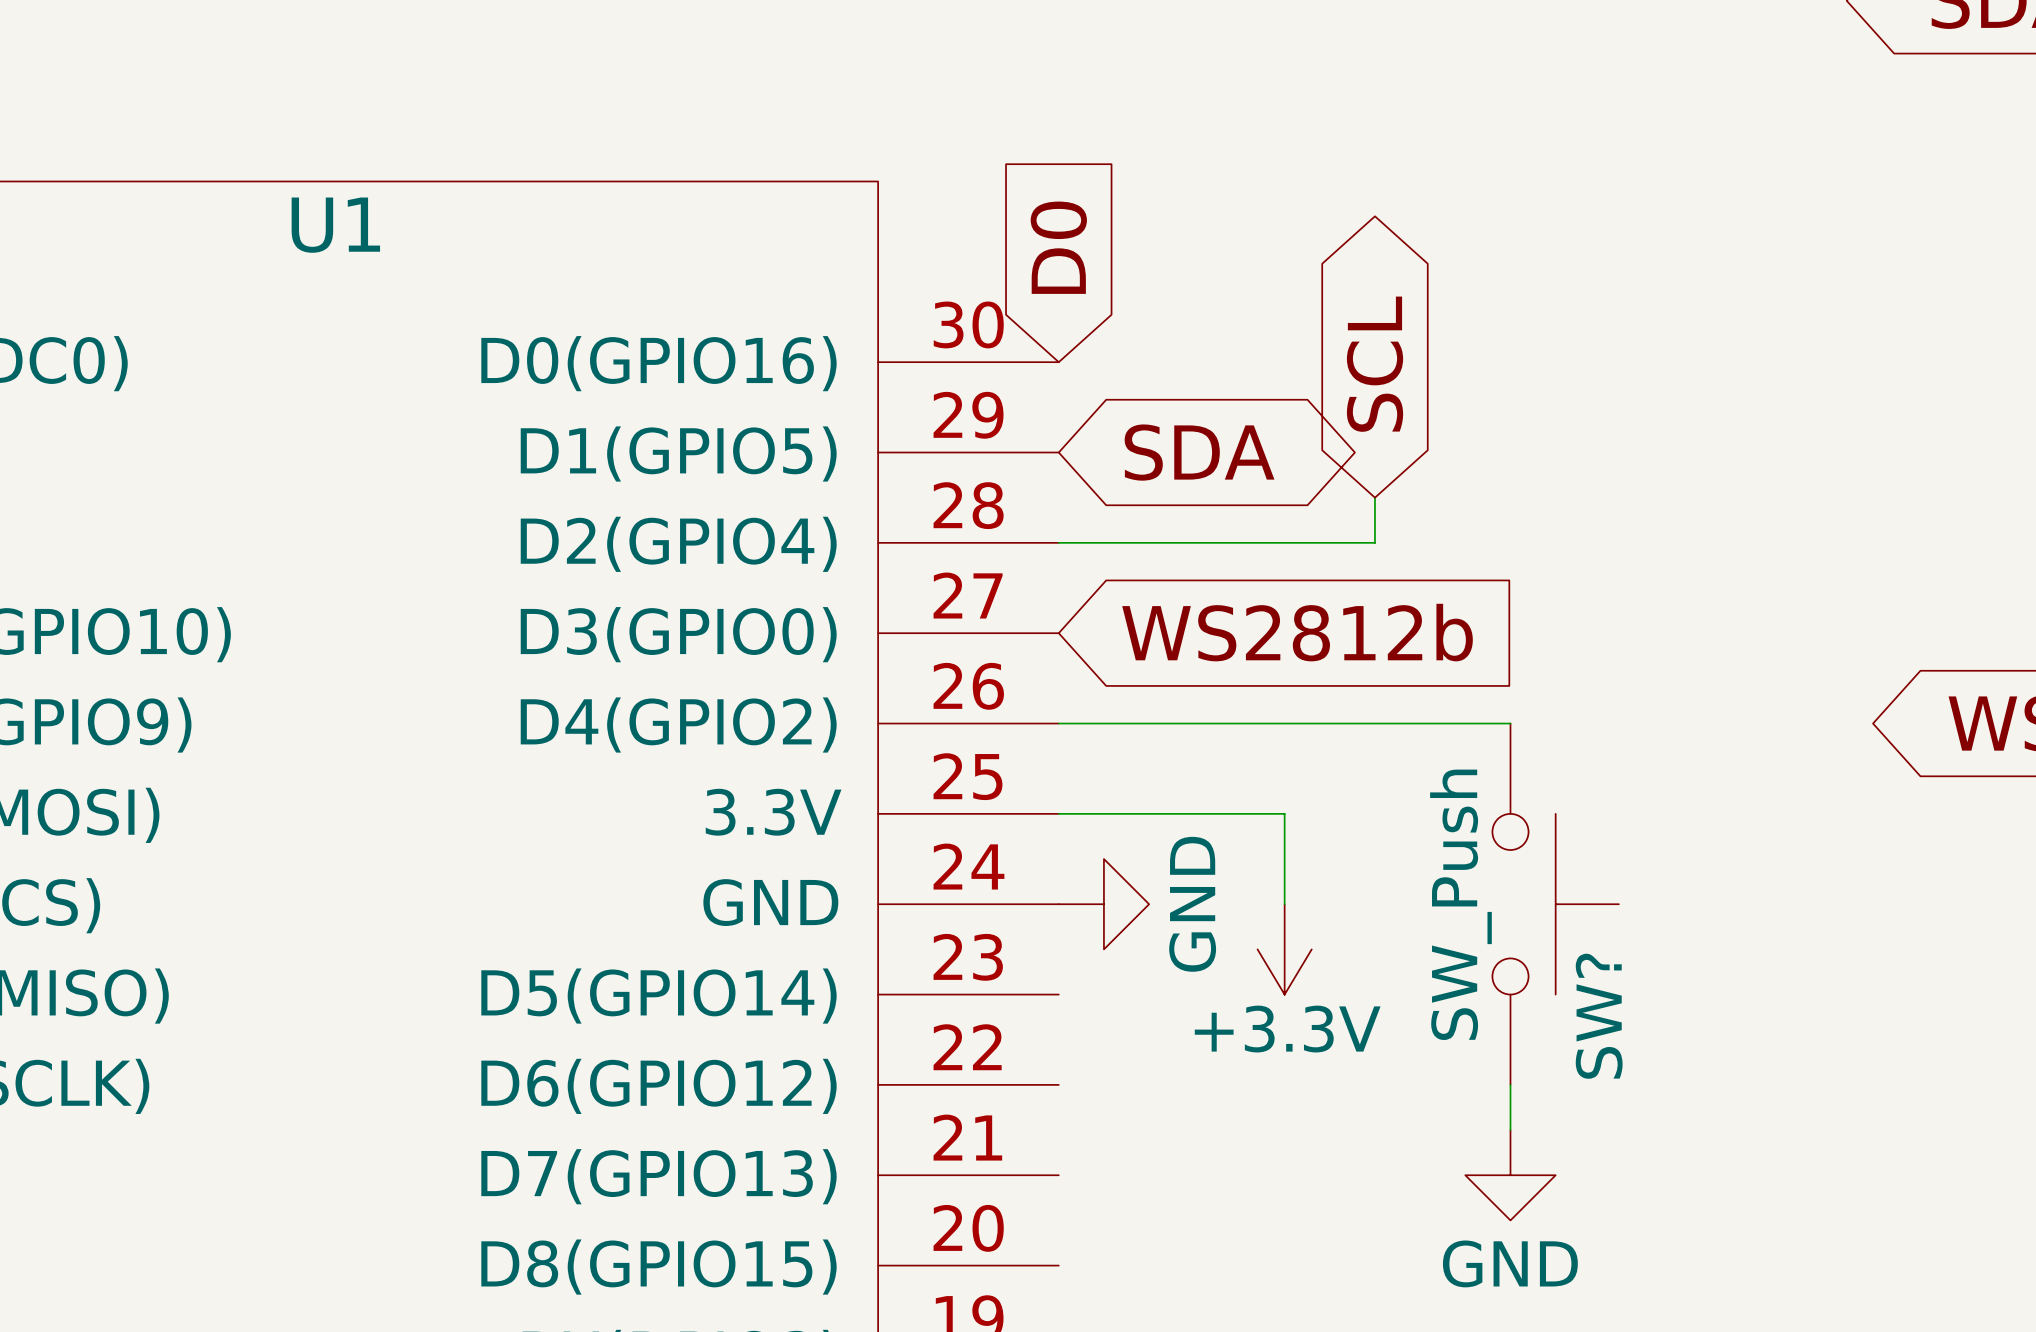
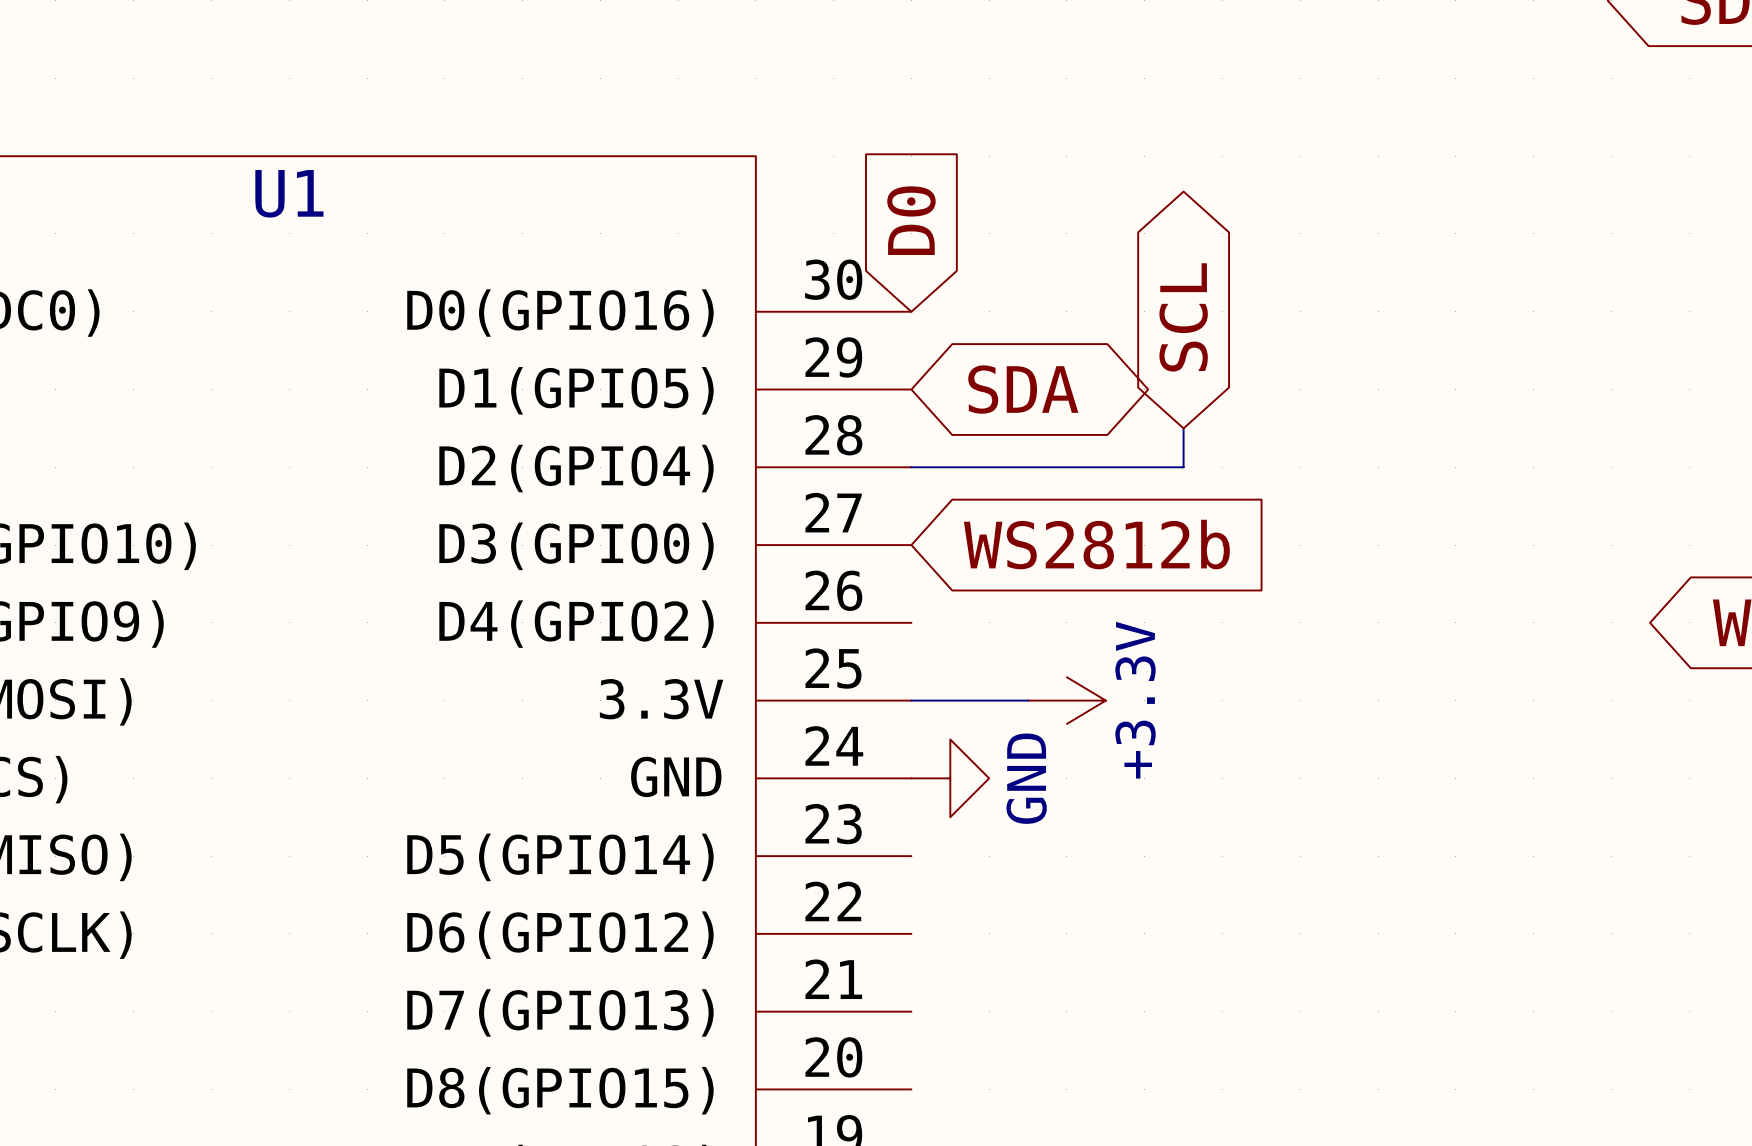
wire: (1058, 723) (1510, 723) -> none
wire: (1194, 813) (1284, 813) (1284, 904) -> none
SW?: SW_Push (1555, 904) -> none
power symbol rotation: 0° (1284, 949) -> 90° counterclockwise (1066, 700)
power symbol position: +3.3V (1284, 949) -> +3.3V (1066, 700)
wire: (1510, 1084) (1510, 1130) -> none
power symbol: GND (1510, 1175) -> none

